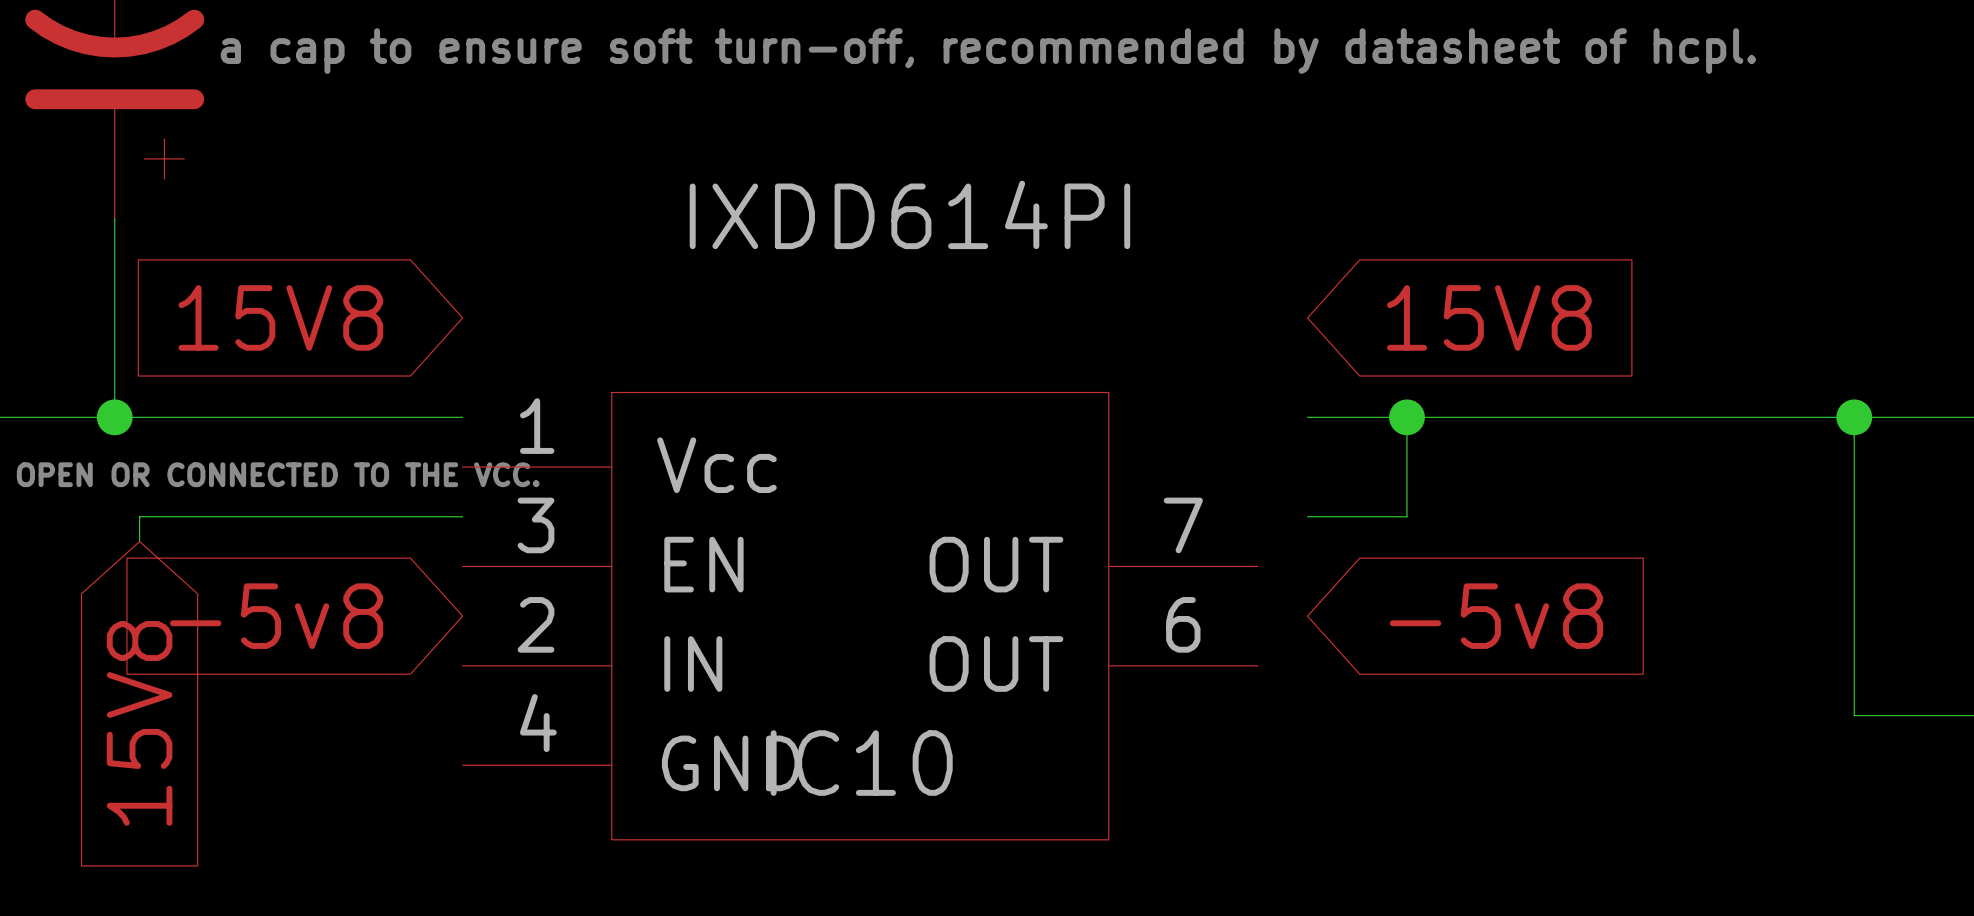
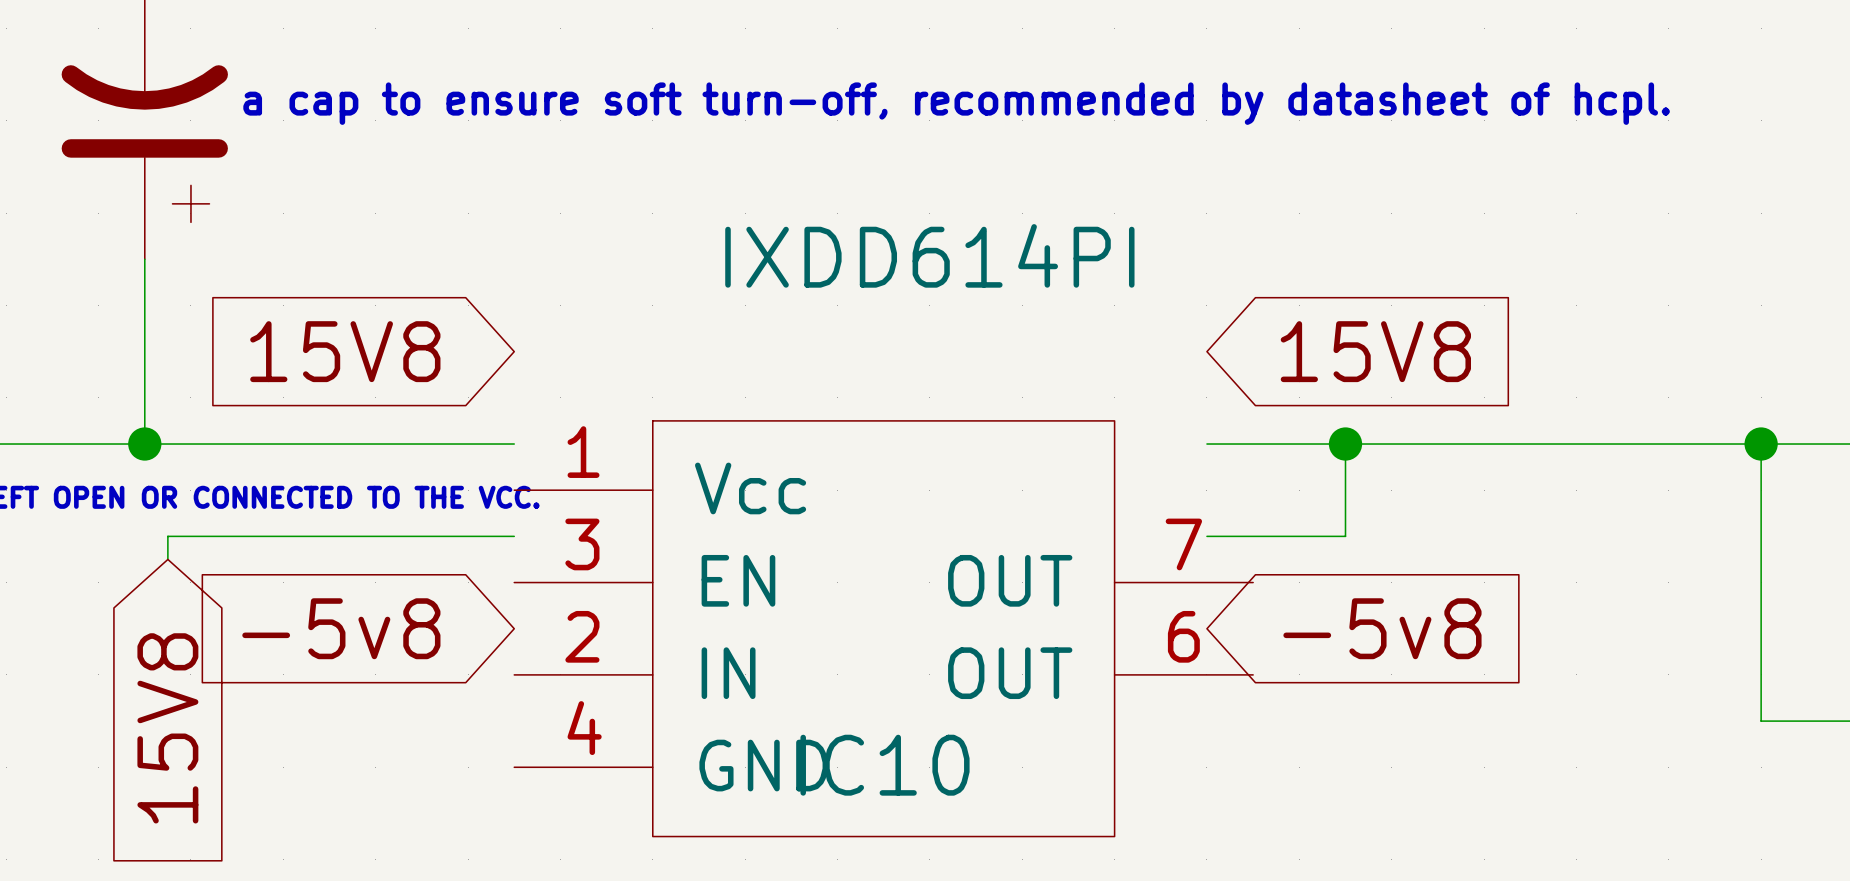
global label position: 15V8 (280, 317) -> 15V8 (345, 351)
global label position: 15V8 (1489, 317) -> 15V8 (1375, 351)
wire: none -> (468, 444) (514, 444)
wire: none -> (1206, 444) (1253, 444)
wire: none -> (468, 536) (514, 536)
wire: none -> (1206, 536) (1253, 536)
global label position: -5v8 (276, 616) -> -5v8 (341, 628)
IC10 position: (860, 616) -> (883, 628)
global label position: -5v8 (1496, 616) -> -5v8 (1382, 628)

